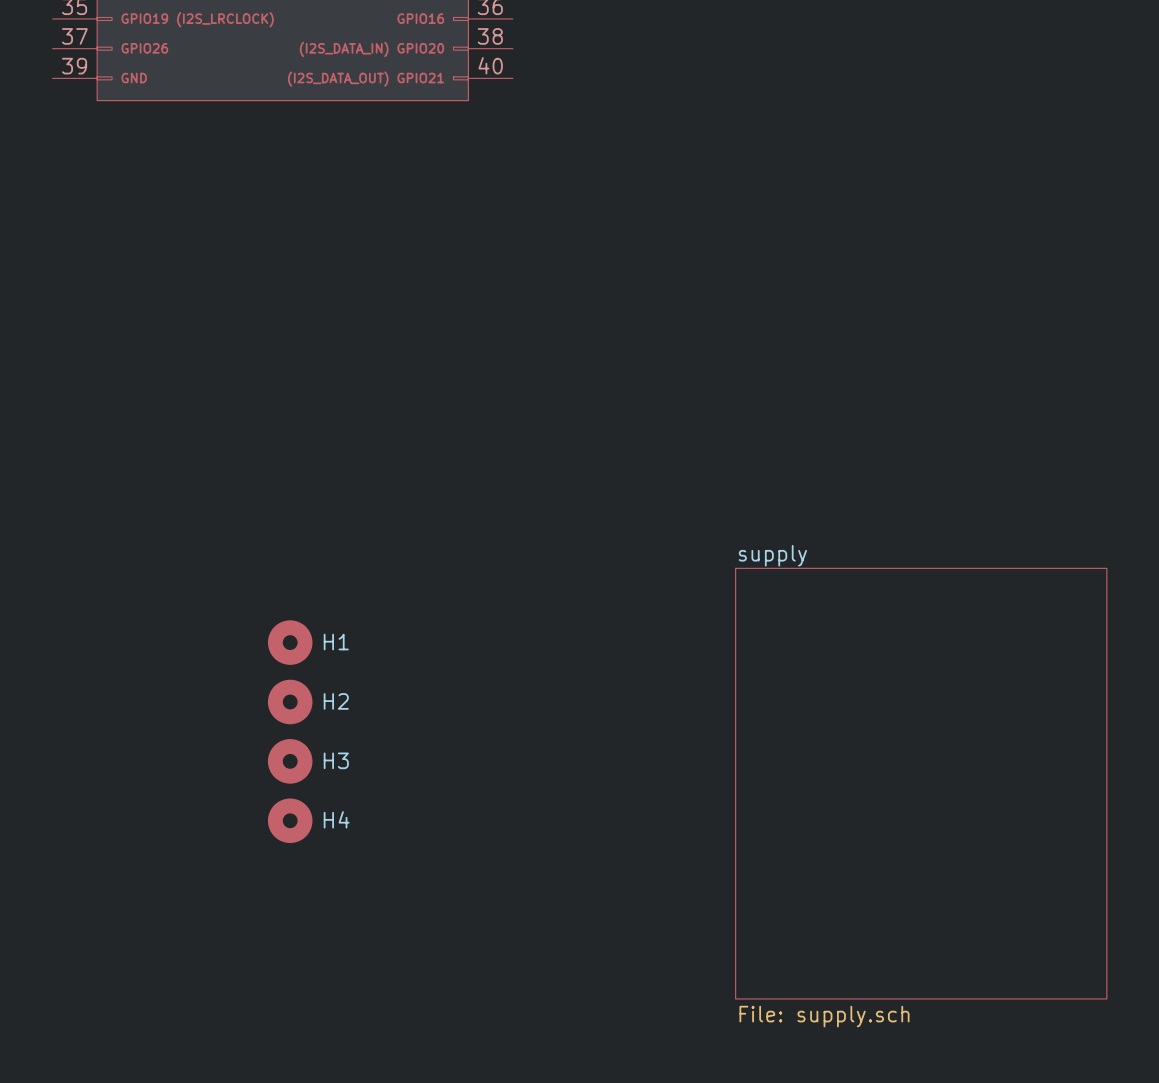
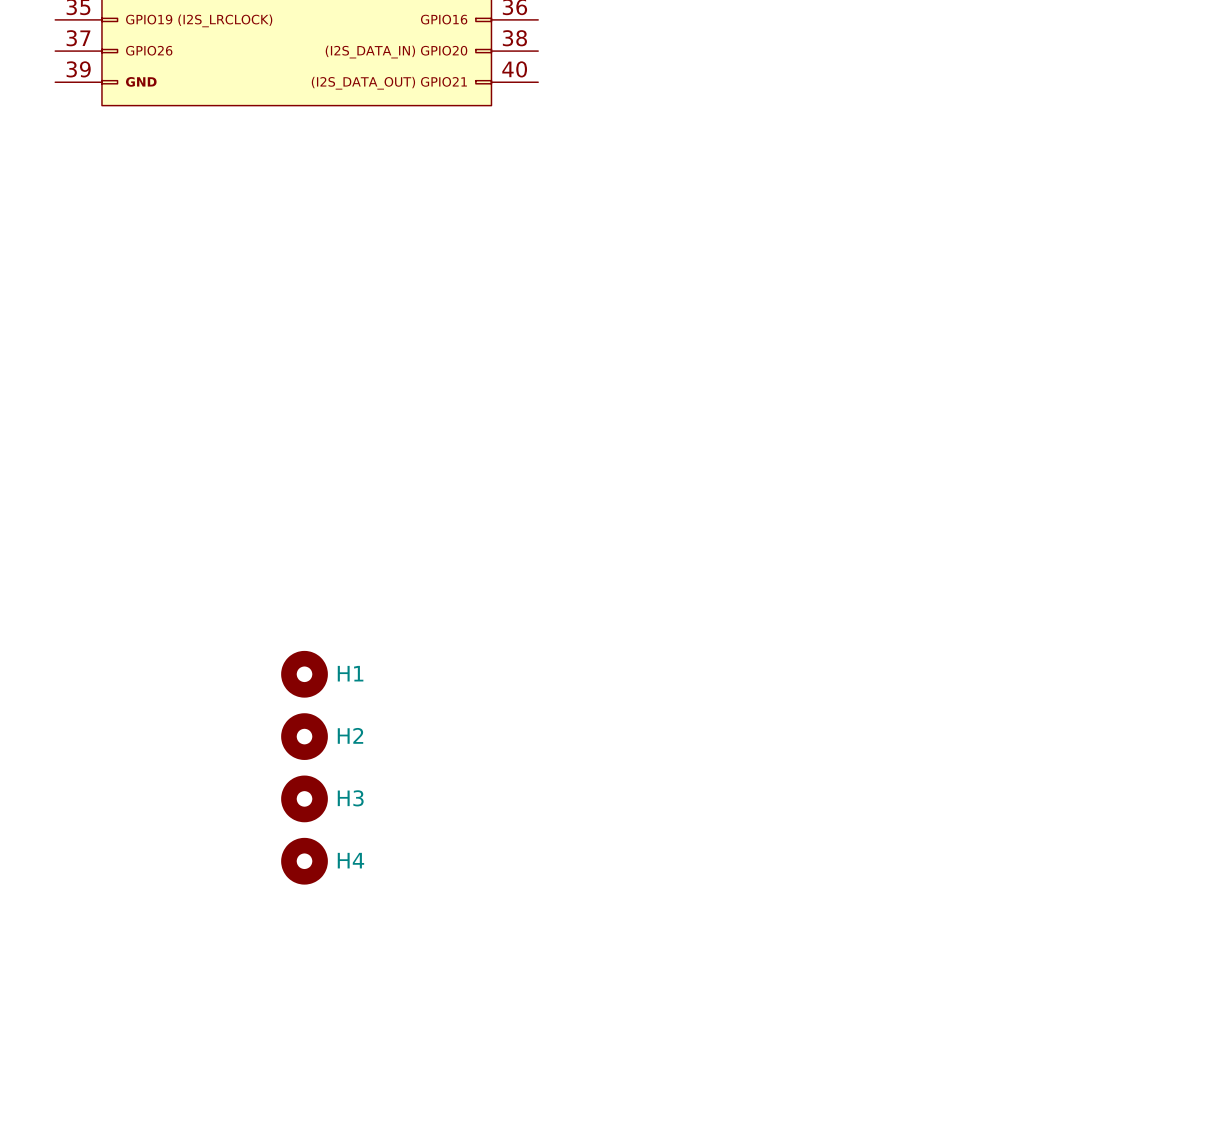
sheet supply: File: supply.sch (921, 783) -> none

